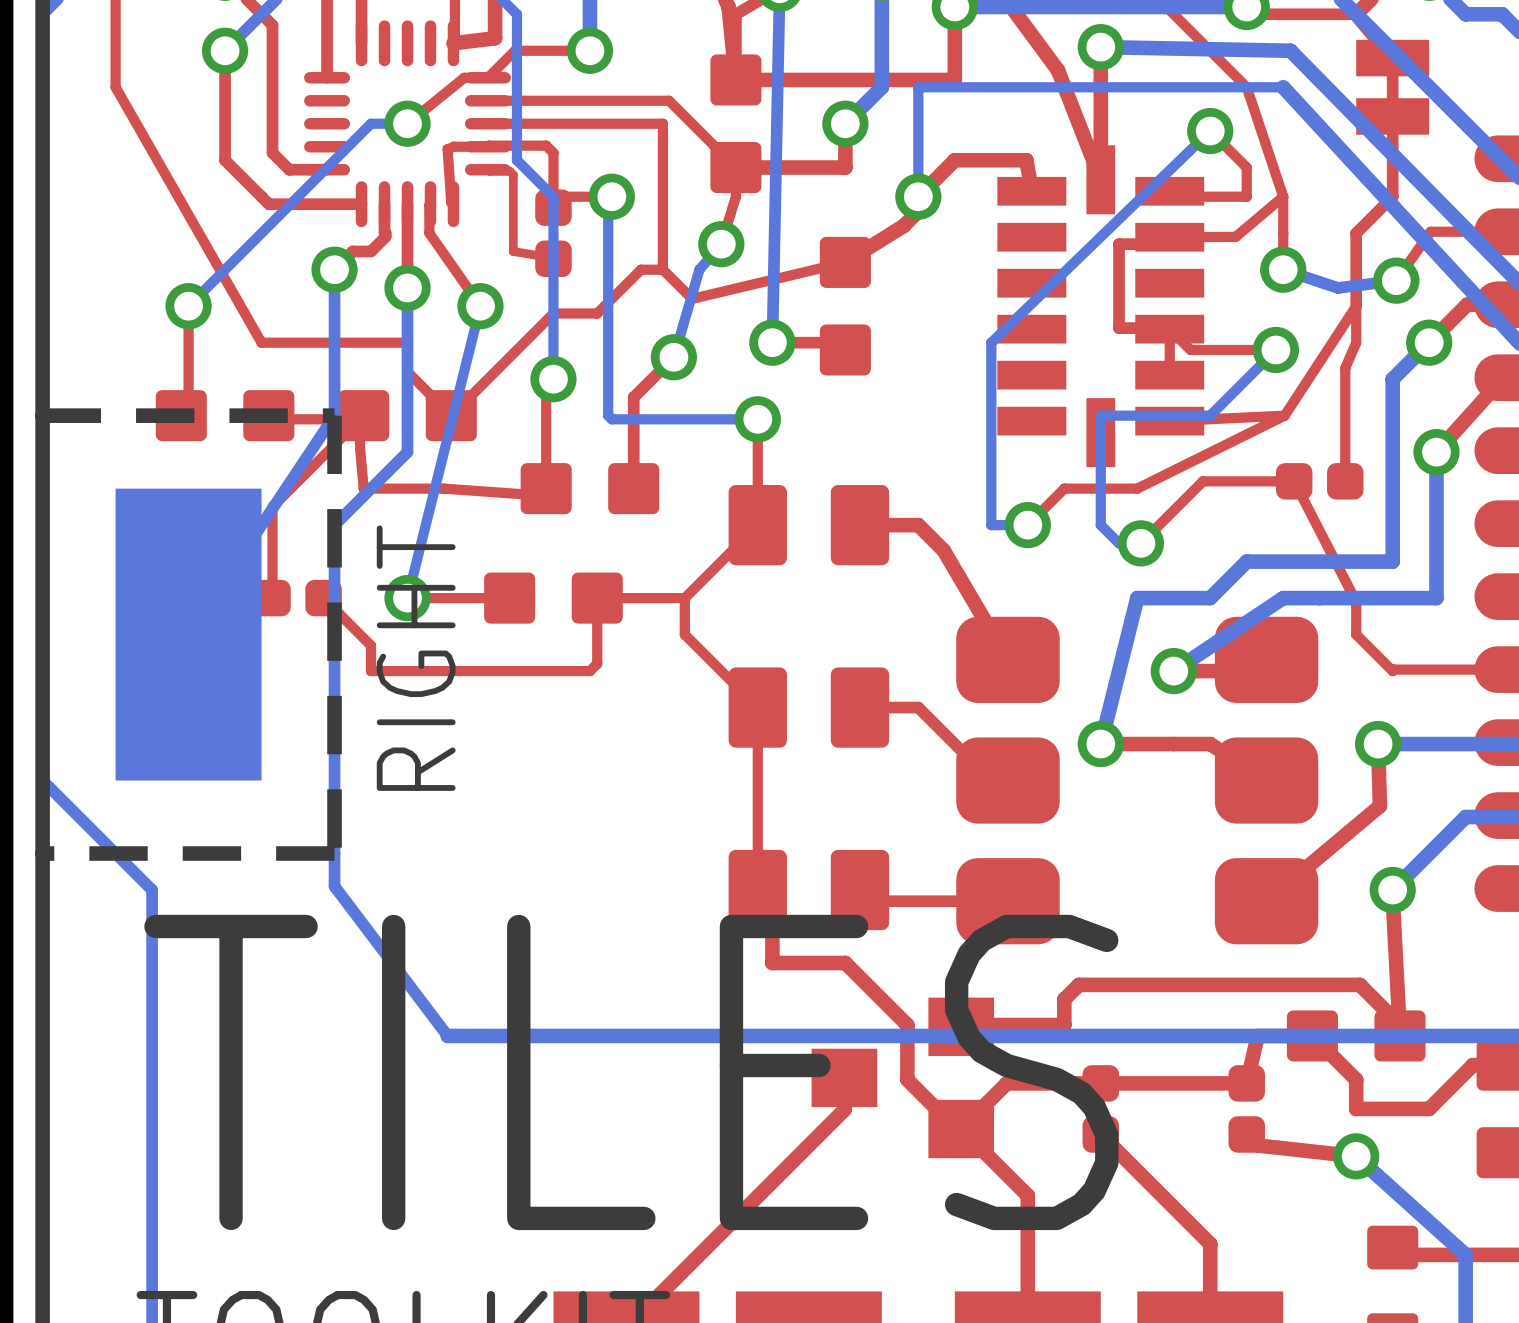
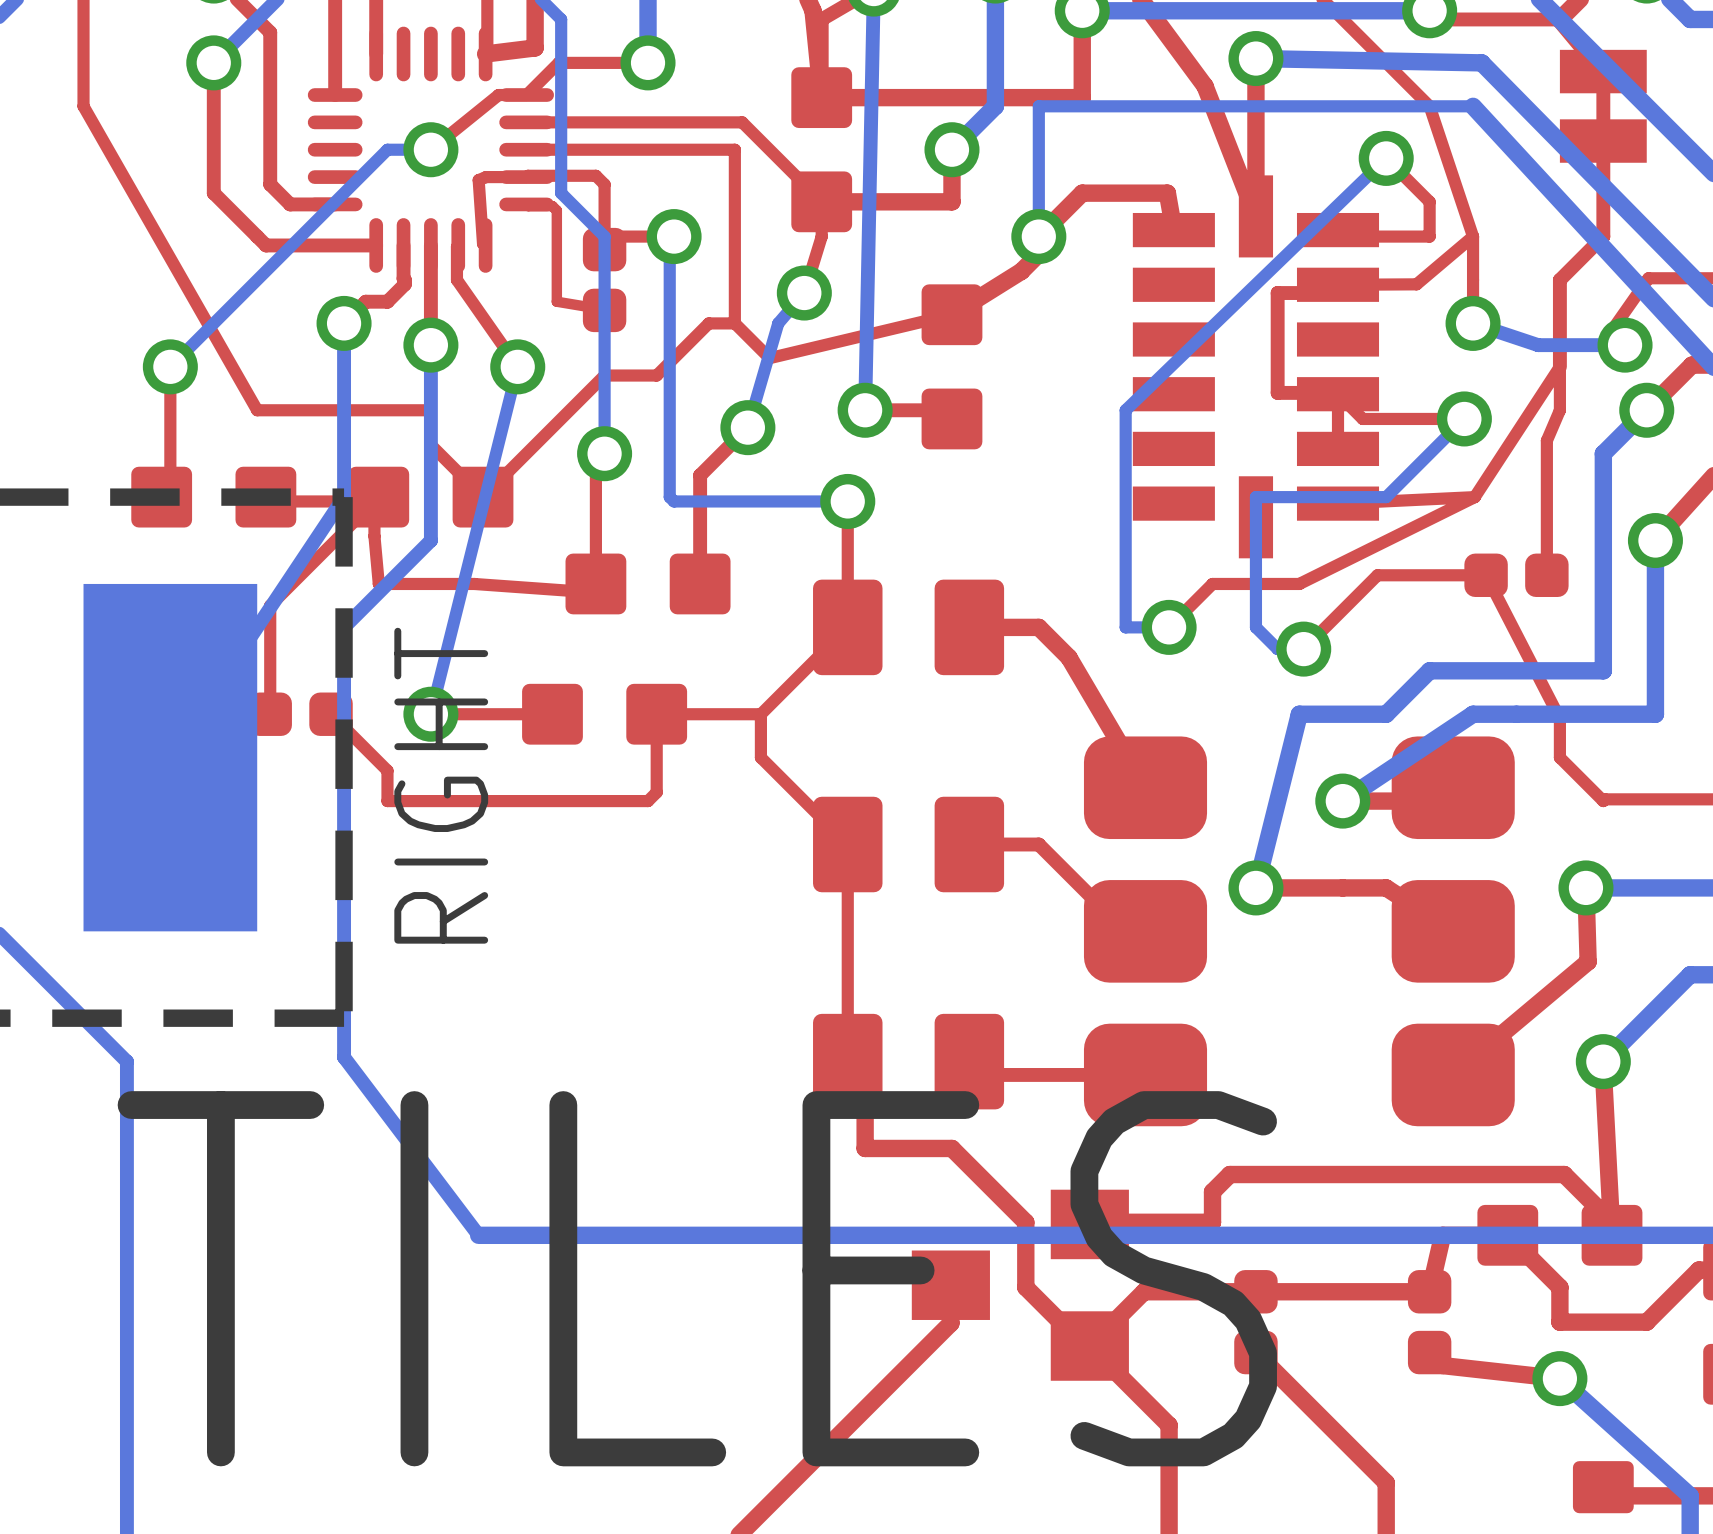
bottom track: (1396, 280) (1337, 287) -> (1625, 345) (1538, 345)
via position: (1396, 280) -> (1625, 345)

